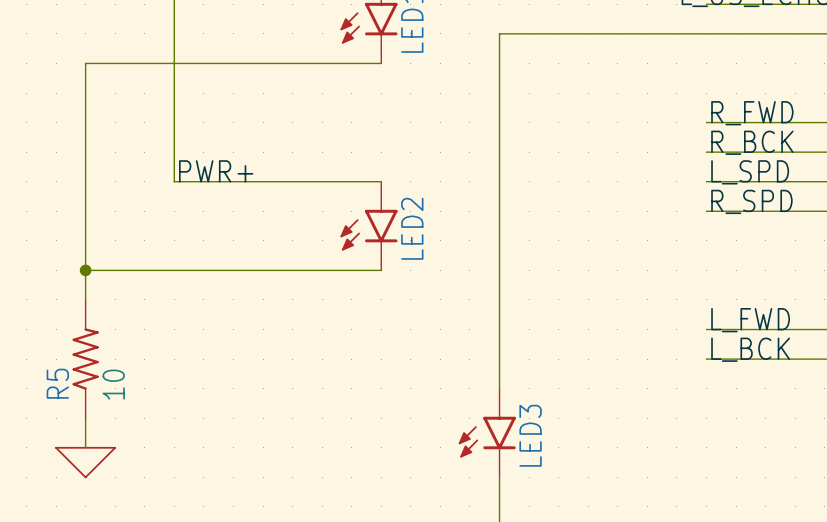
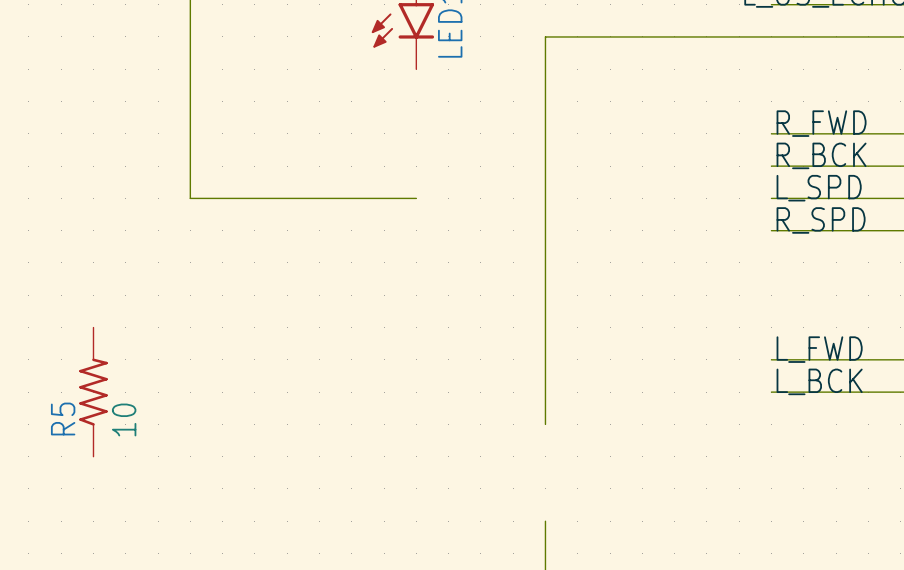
wire: (381, 63) (85, 63) (85, 299) -> none
label: PWR+ (216, 171) -> none
LED2: (368, 226) -> none
wire: (85, 270) (381, 270) -> none
junction: (85, 270) -> none
wire: (85, 418) (85, 447) -> none
LED3: (487, 433) -> none
power symbol: (85, 462) -> none

